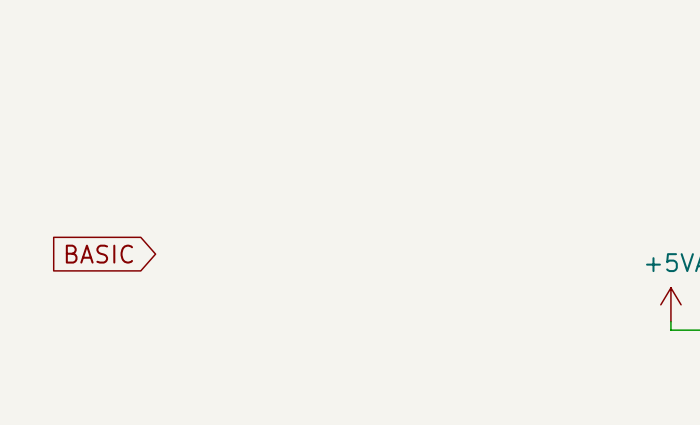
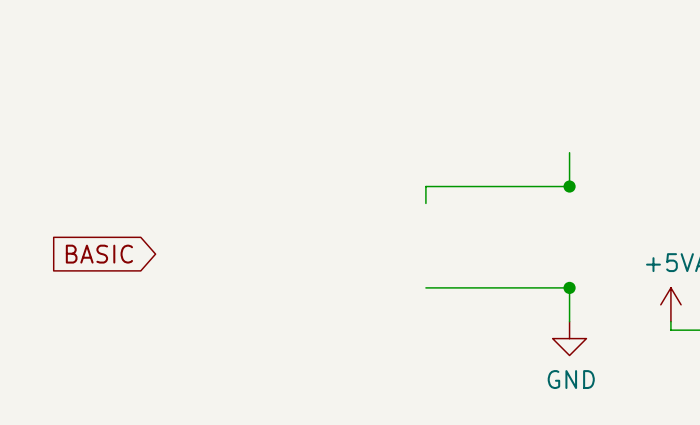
wire: none -> (569, 152) (569, 186) (425, 186) (425, 203)
junction: none -> (569, 186)
wire: none -> (425, 287) (569, 287) (569, 321)
junction: none -> (569, 287)
power symbol: none -> GND (569, 338)

